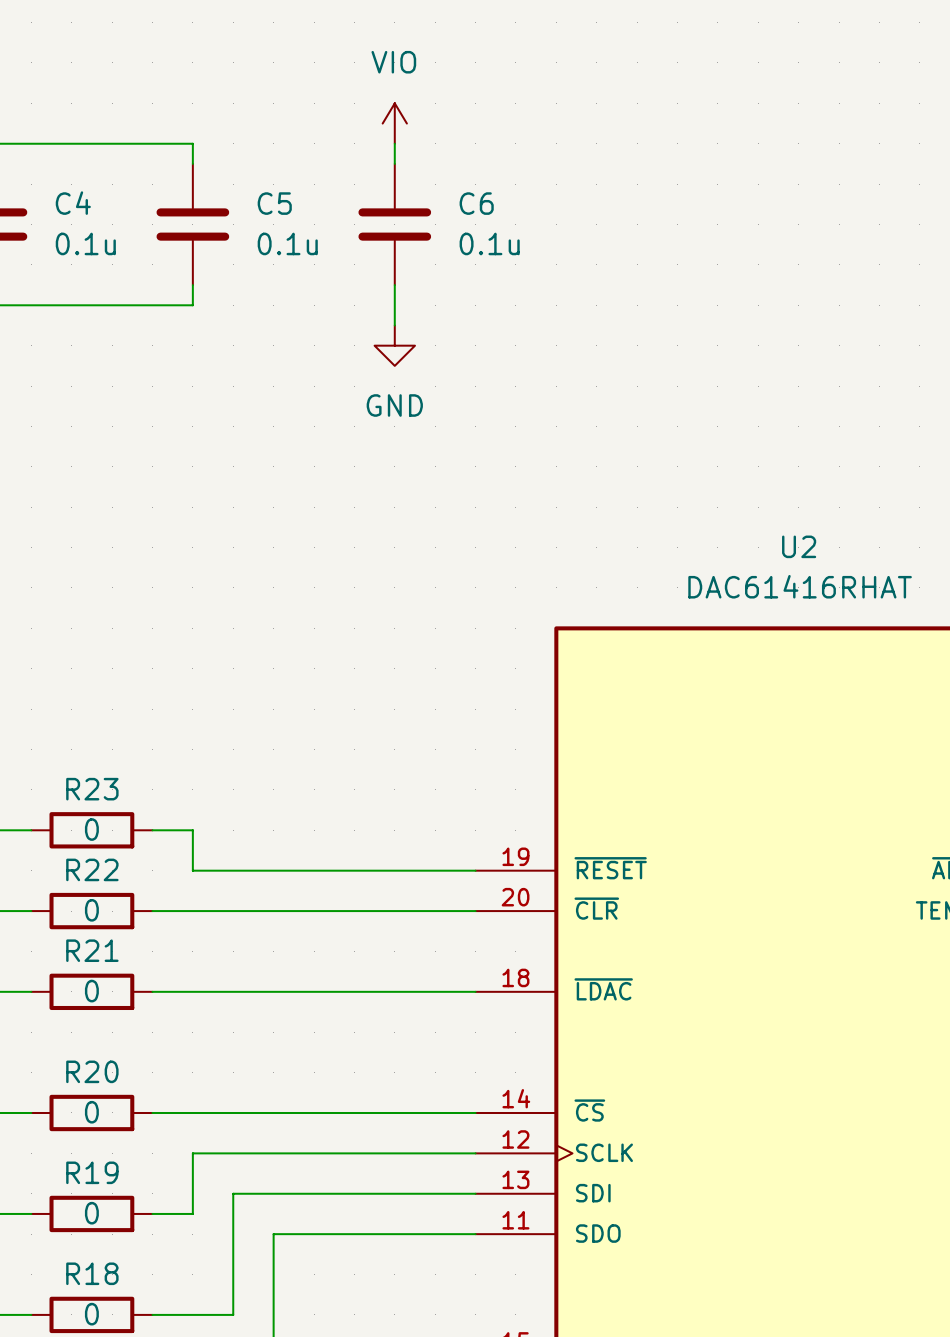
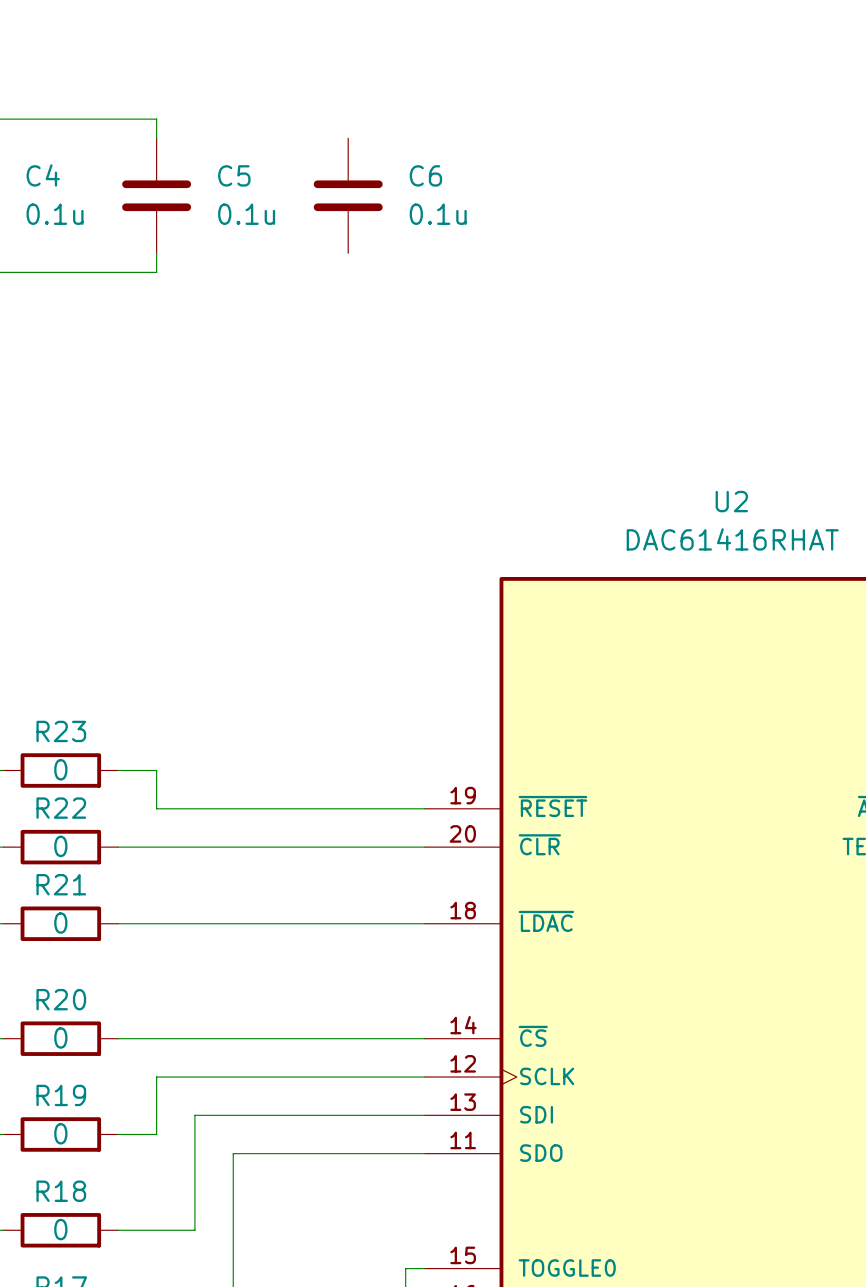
power symbol: VIO (394, 123) -> none
wire: (394, 143) (394, 163) -> none
wire: (394, 285) (394, 325) -> none
power symbol: GND (394, 345) -> none

